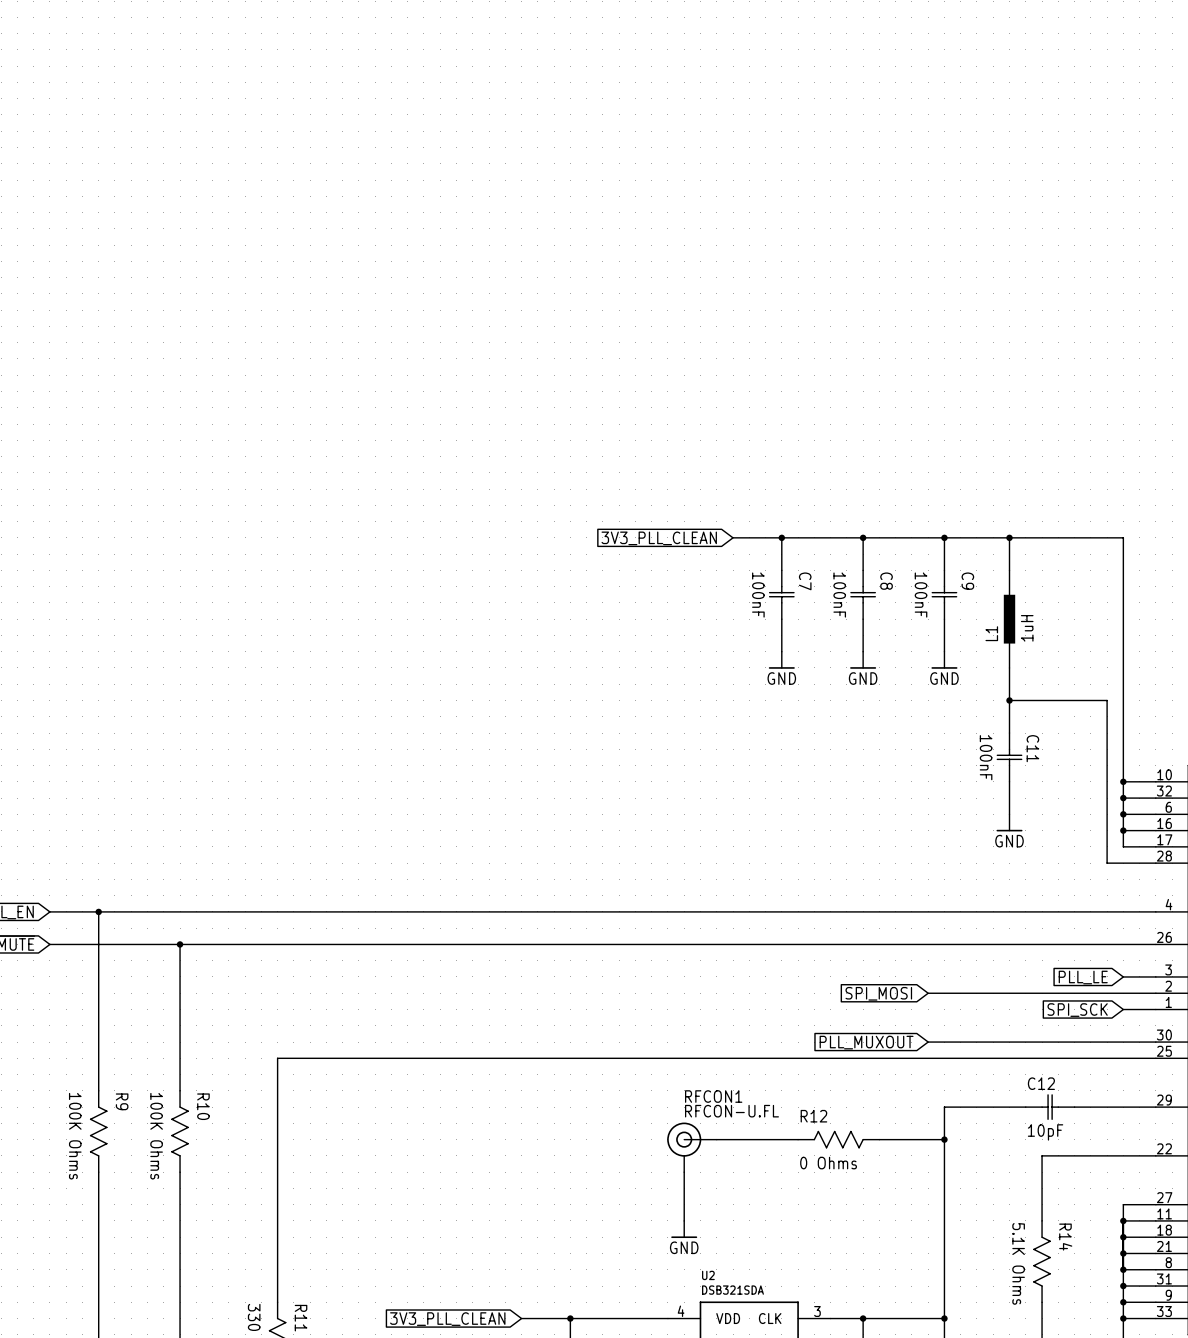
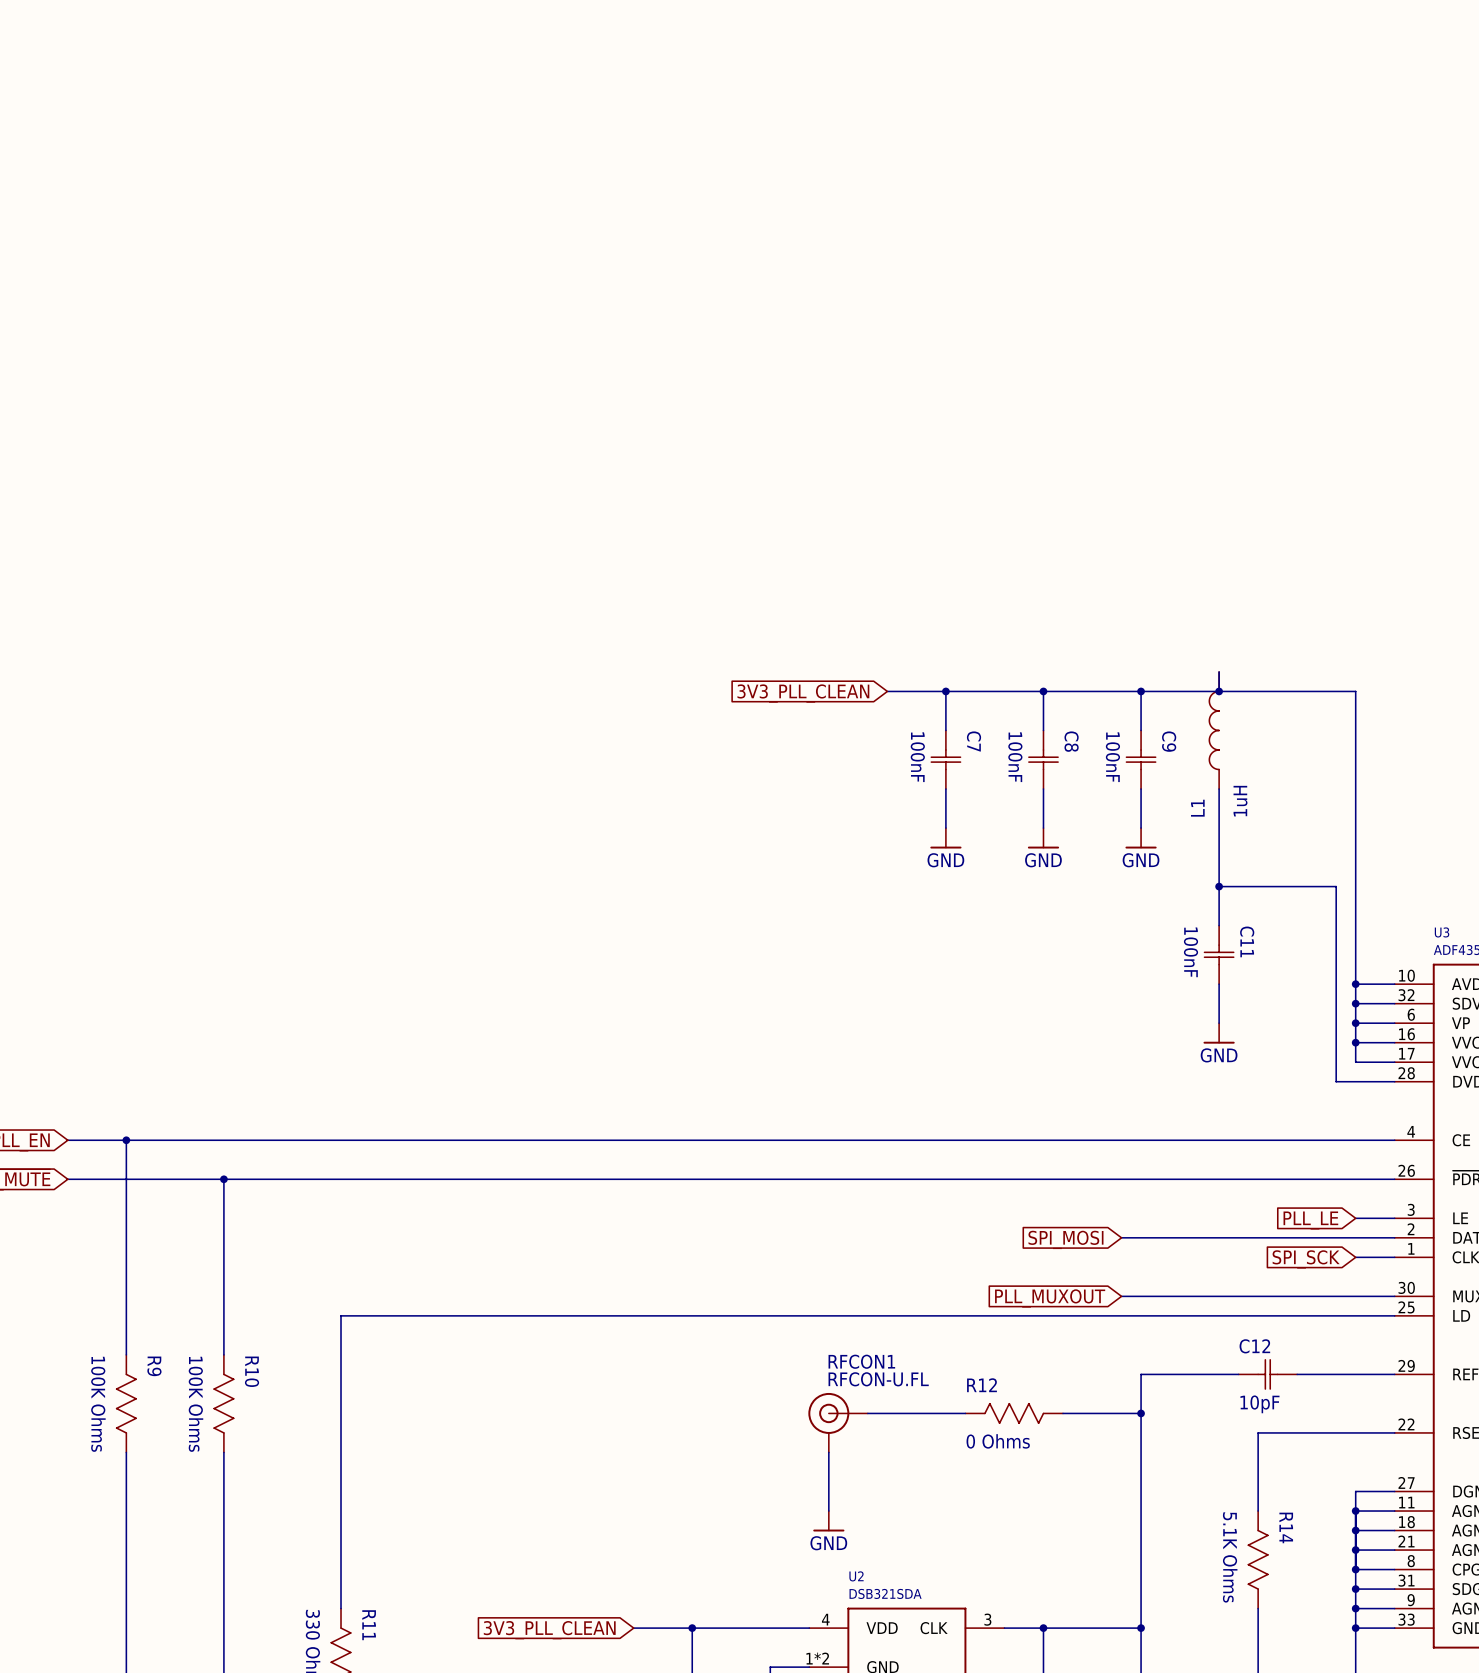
wire: (1009, 537) (1009, 570) -> (1219, 691) (1219, 671)
L1 symbol: [1003, 570, 1016, 668] -> [1208, 671, 1220, 790]

